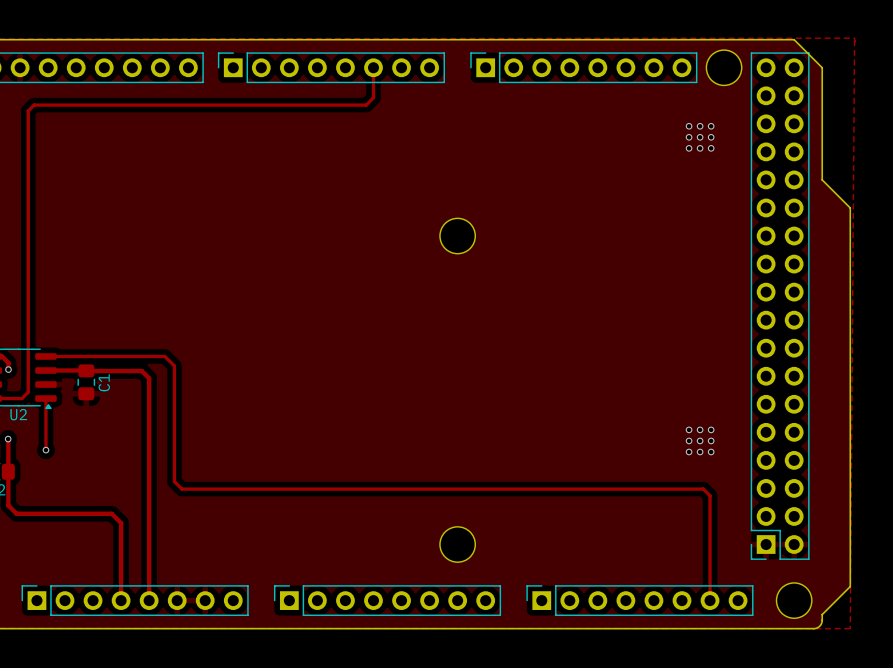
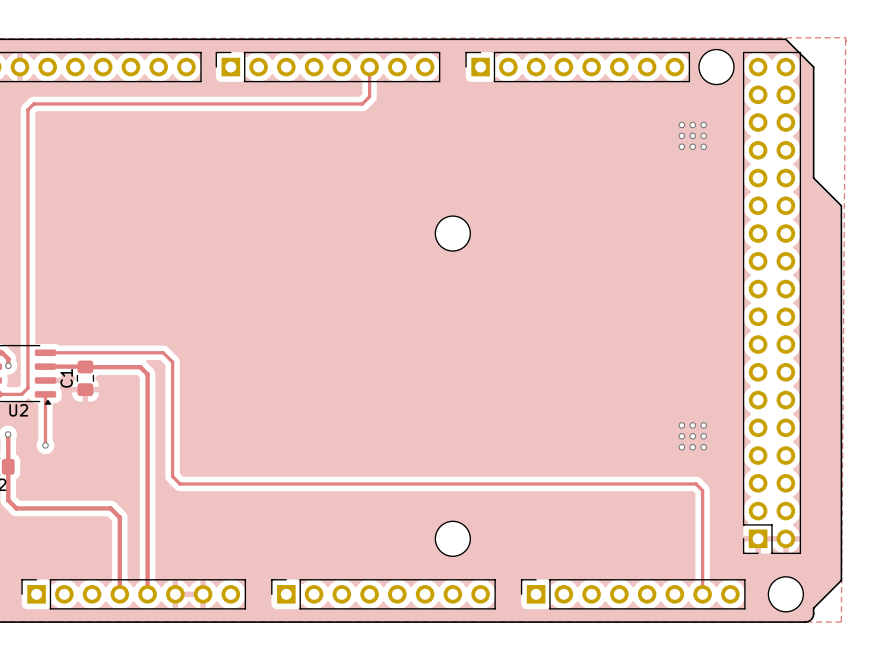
C1 name position: C1 (104, 382) -> C1 (66, 378)

